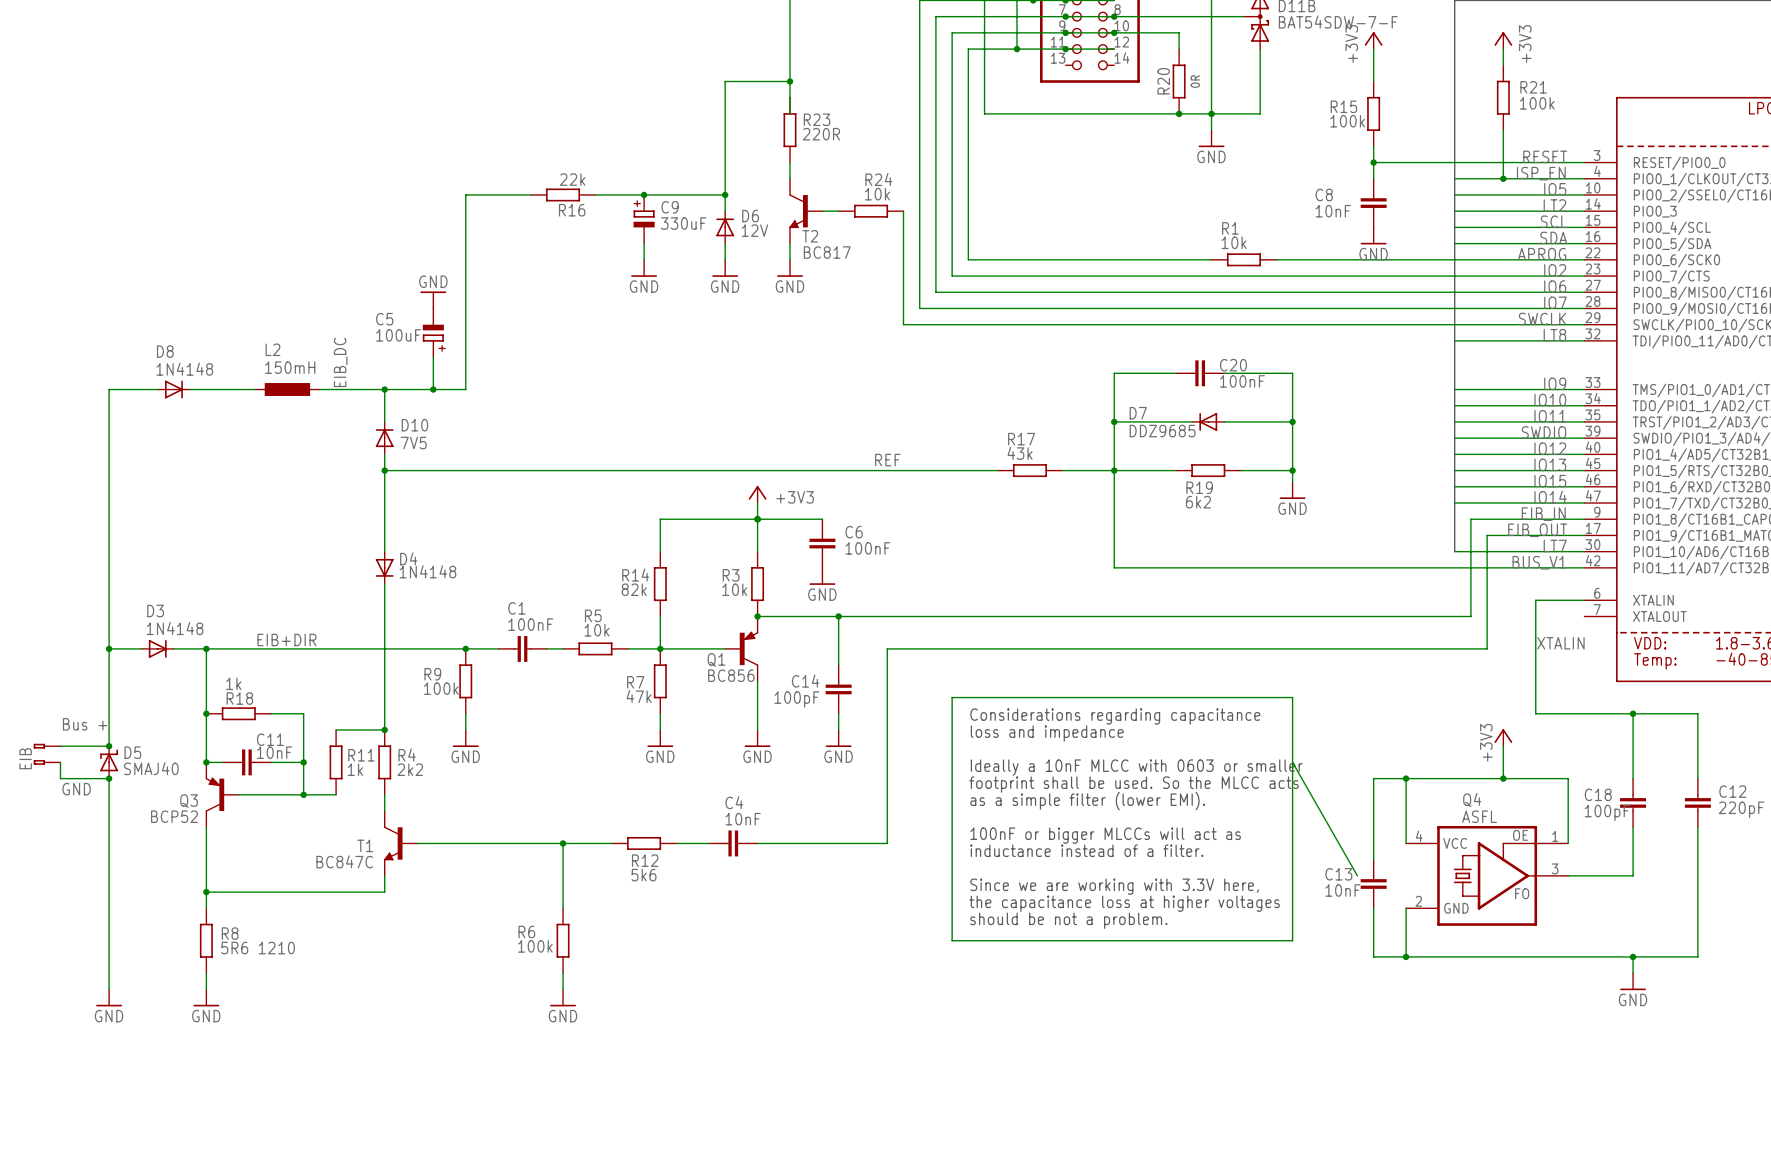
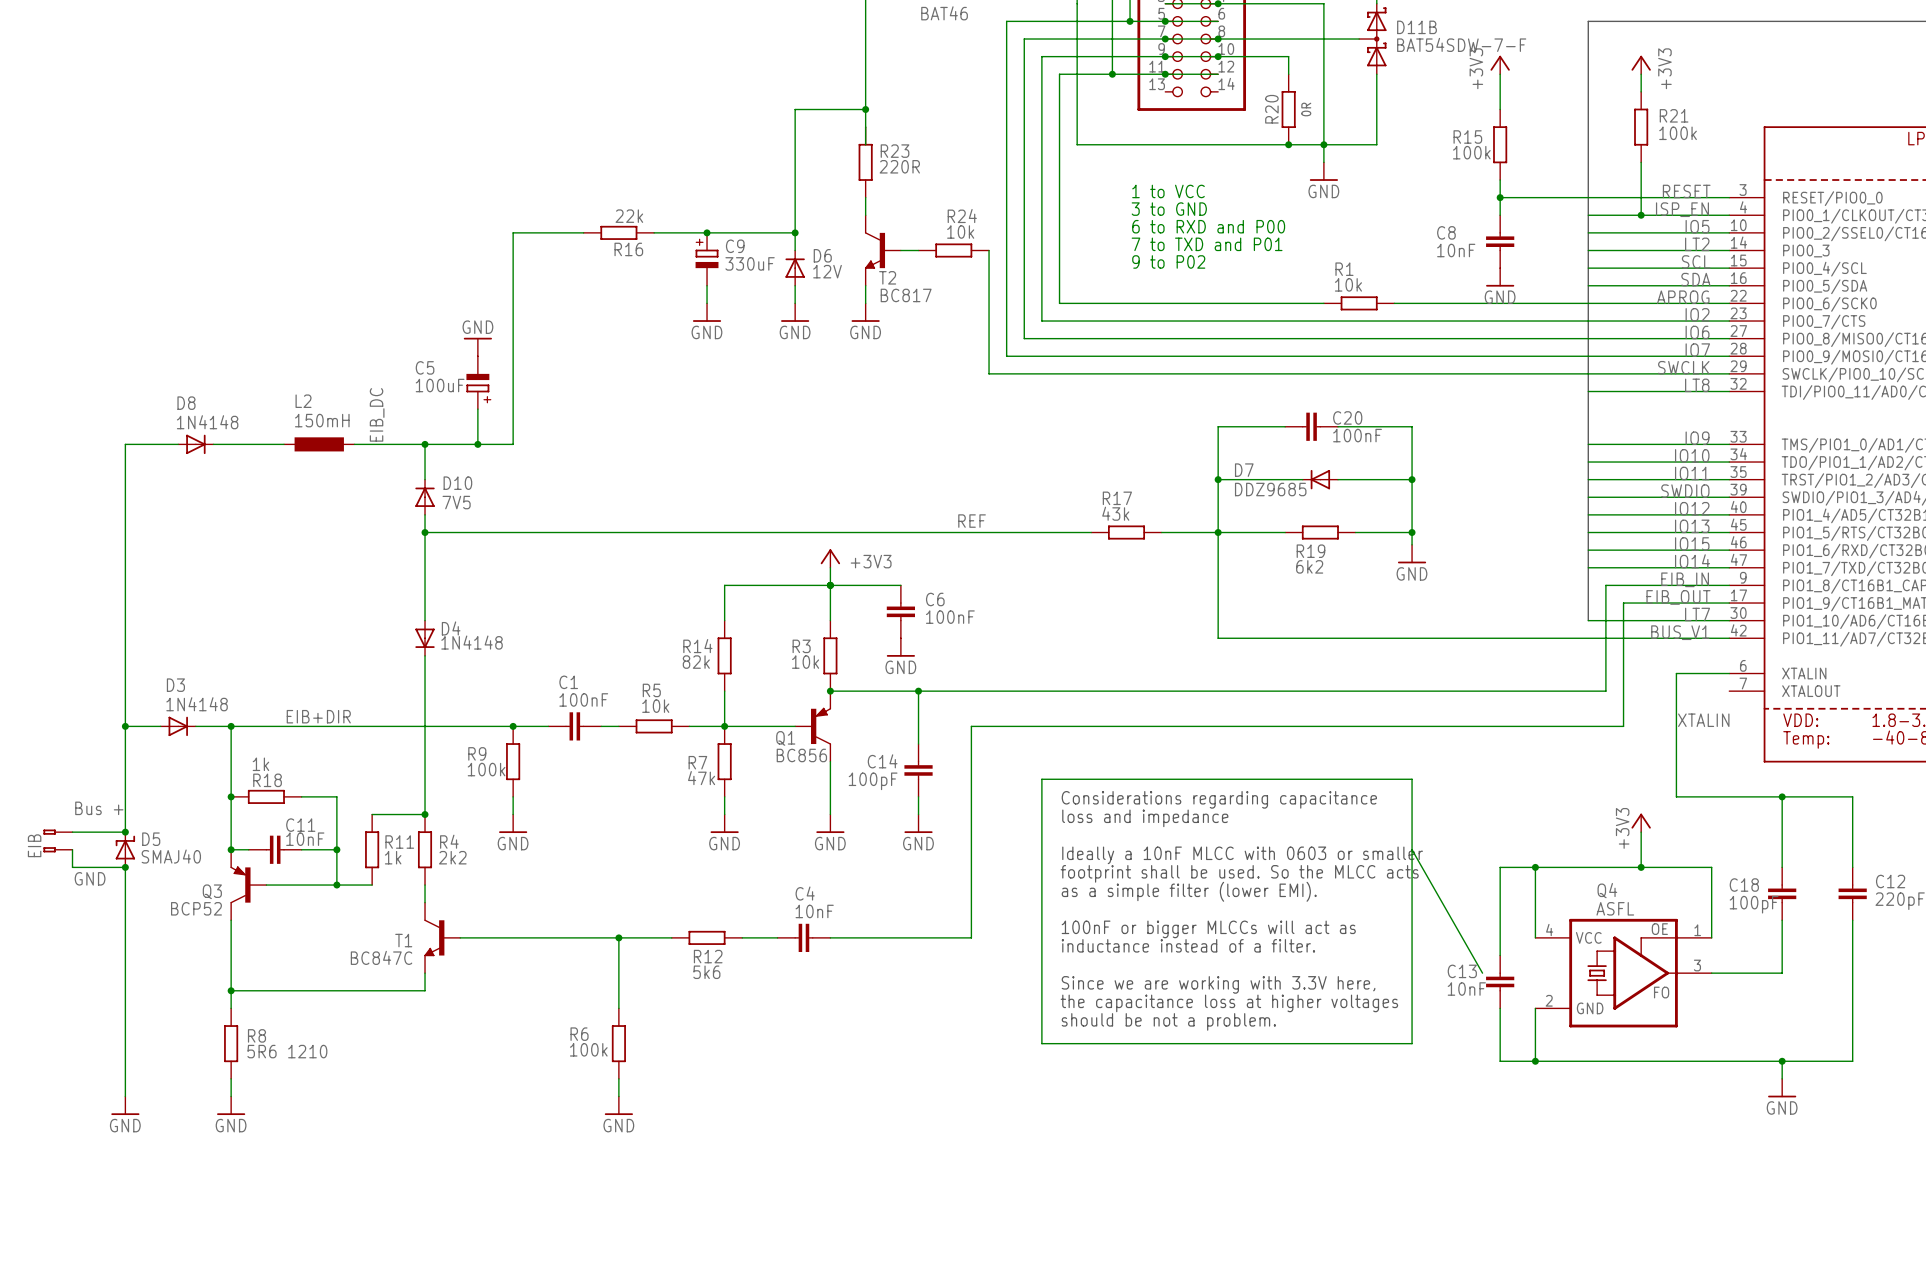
text: none -> 1 to VCC (1168, 191)
text: none -> 3 to GND (1169, 209)
text: none -> 6 to RXD and P00 (1208, 226)
text: none -> 7 to TXD and P01 (1207, 244)
text: none -> 9 to P02 (1168, 261)

